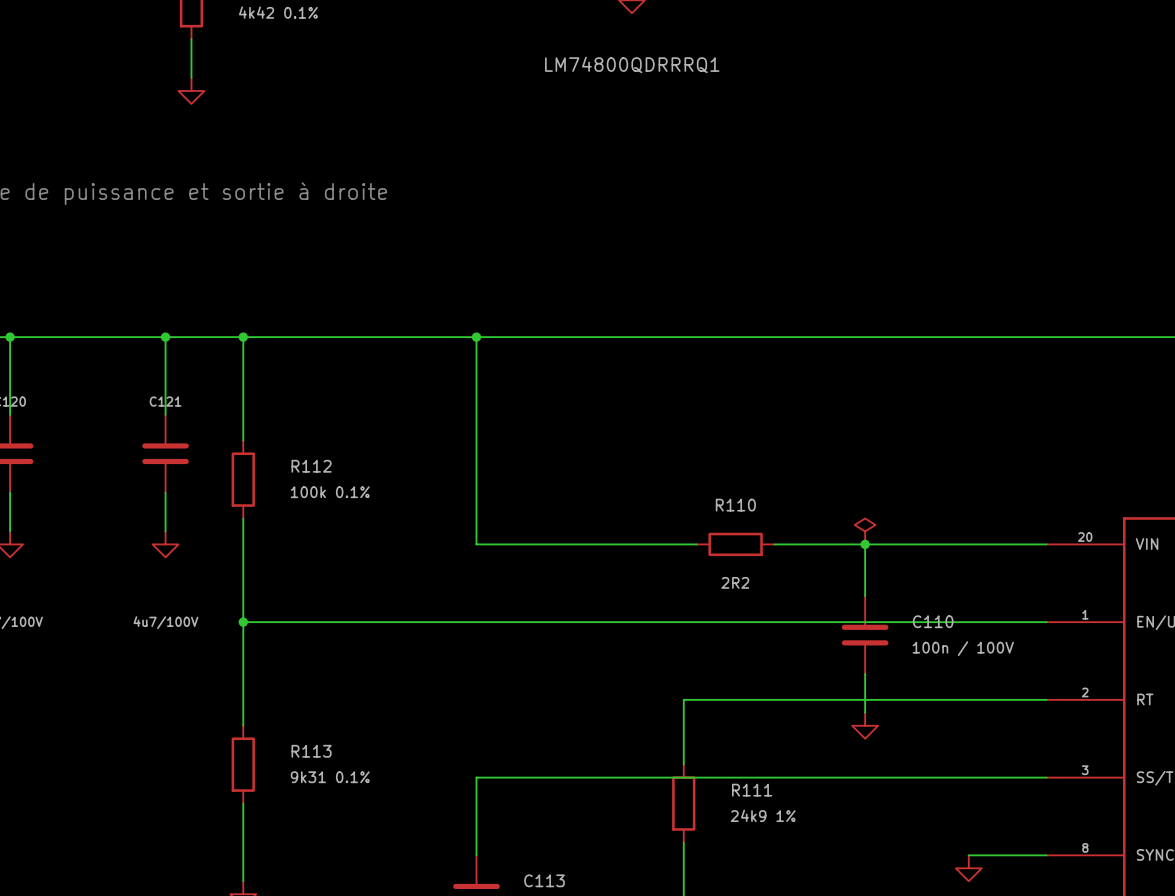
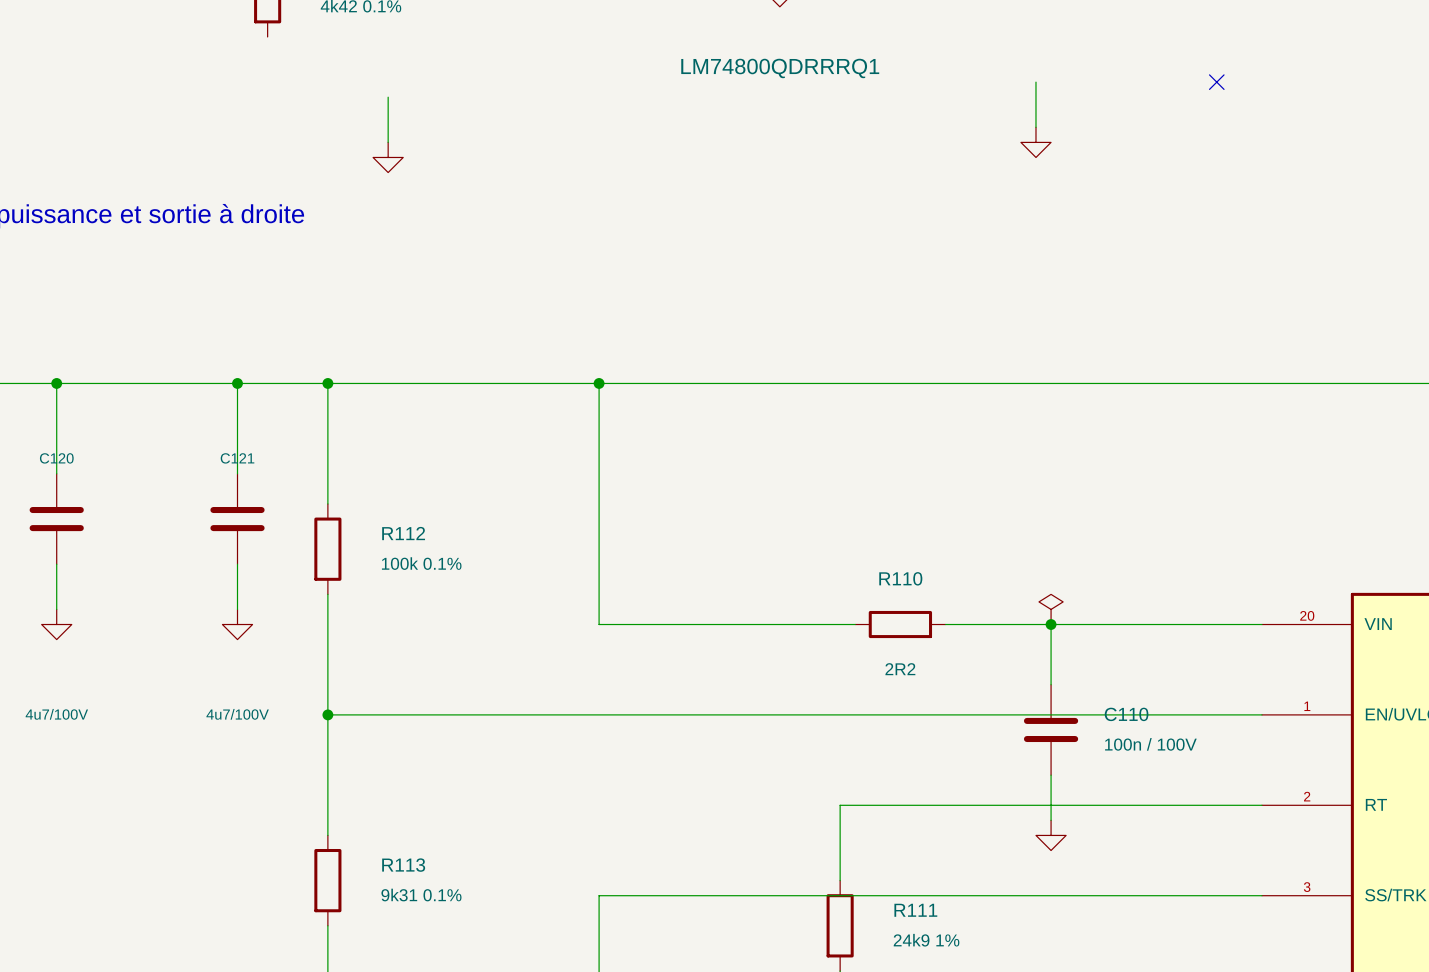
wire: (191, 39) (191, 78) -> (388, 97) (388, 142)
wire: none -> (1035, 82) (1035, 127)
no-connect mark: none -> (1216, 82)
power symbol: (191, 90) -> none
power symbol: none -> (1035, 142)
power symbol: none -> (388, 157)

